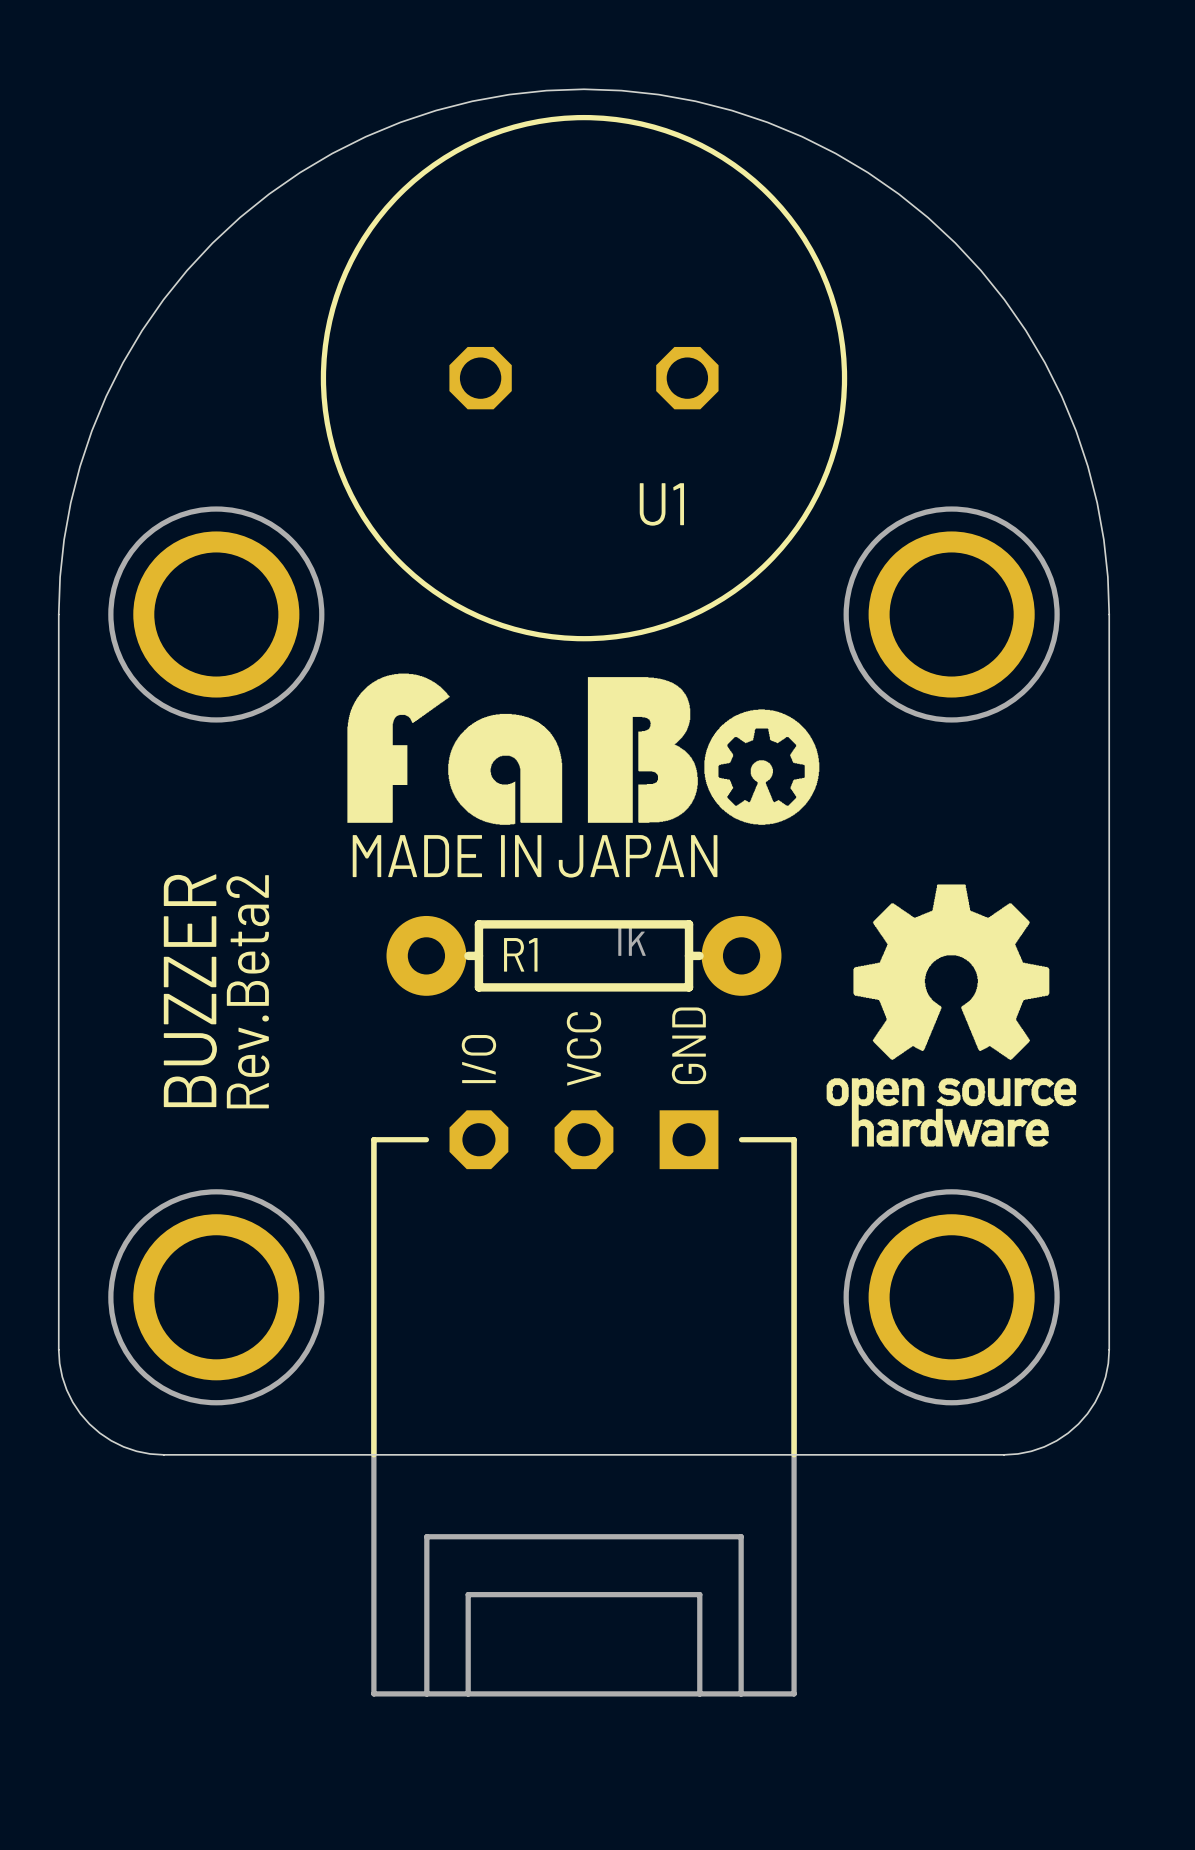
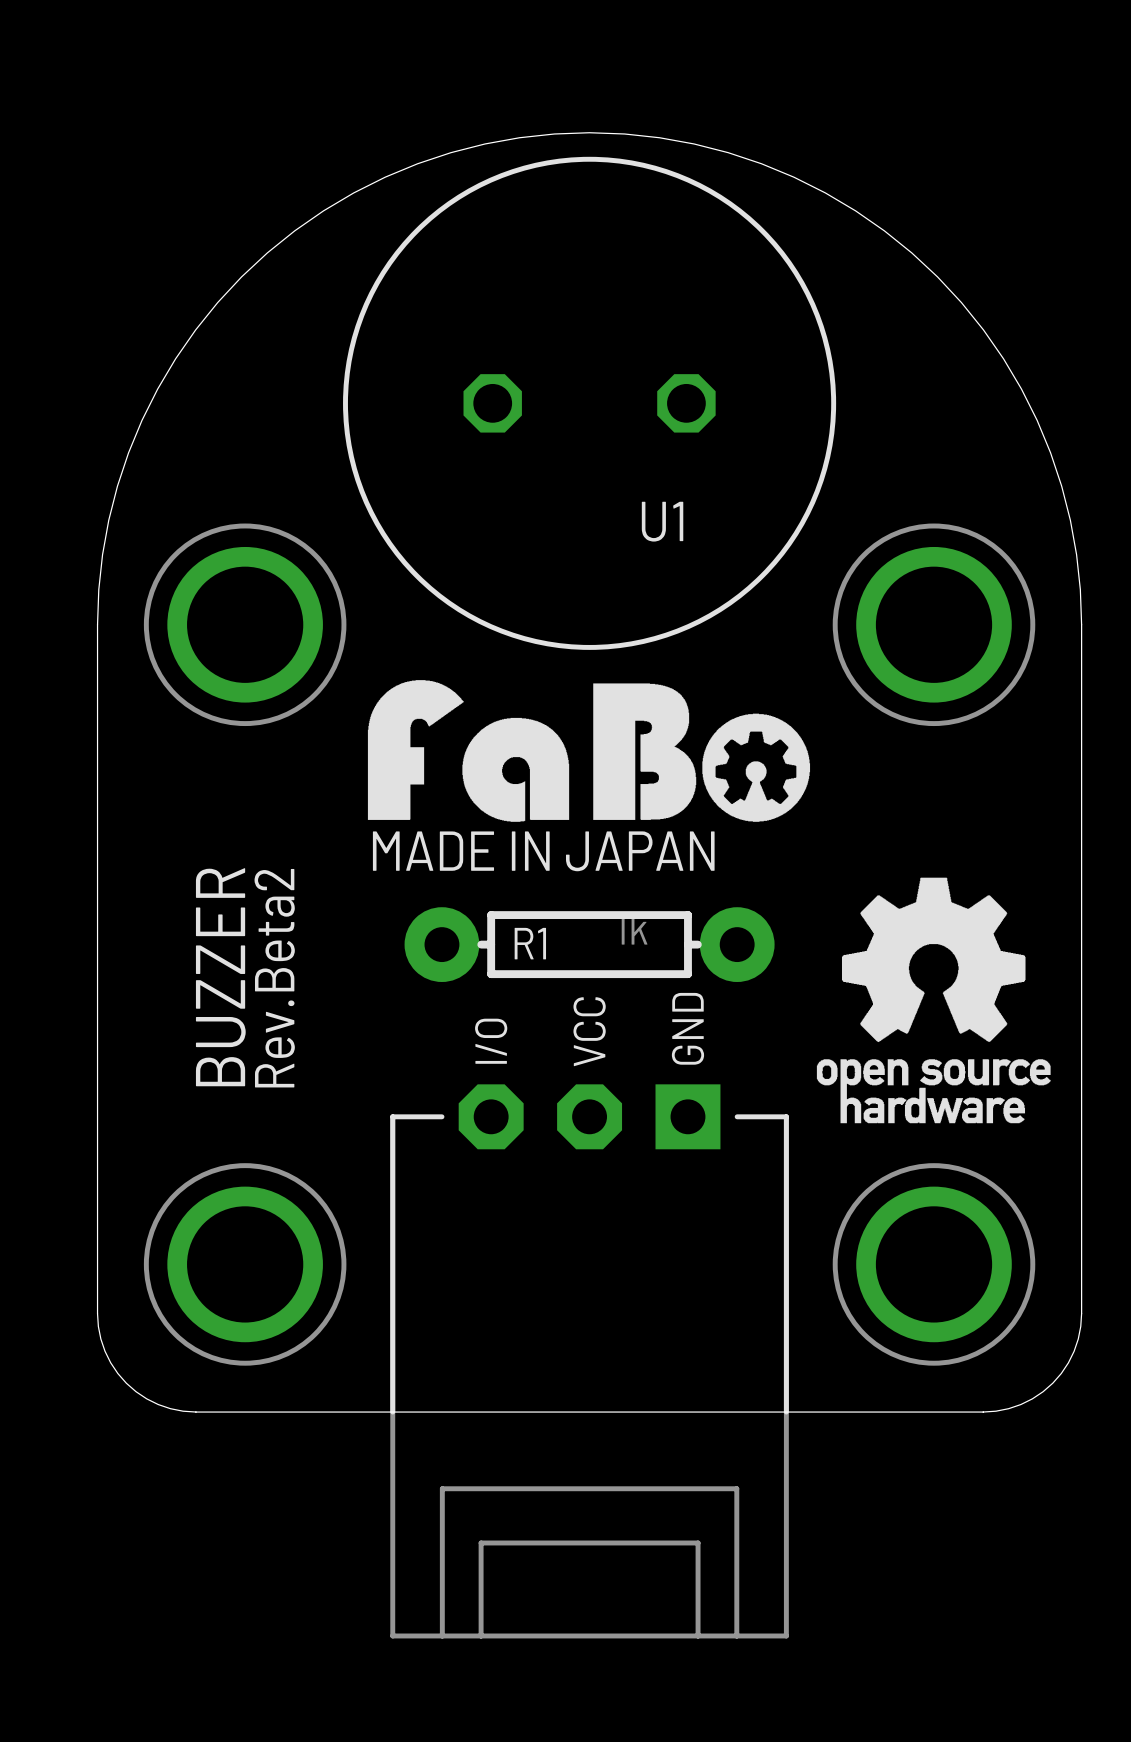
part footprint: [58, 89, 1110, 1697] -> [97, 132, 1082, 1639]

